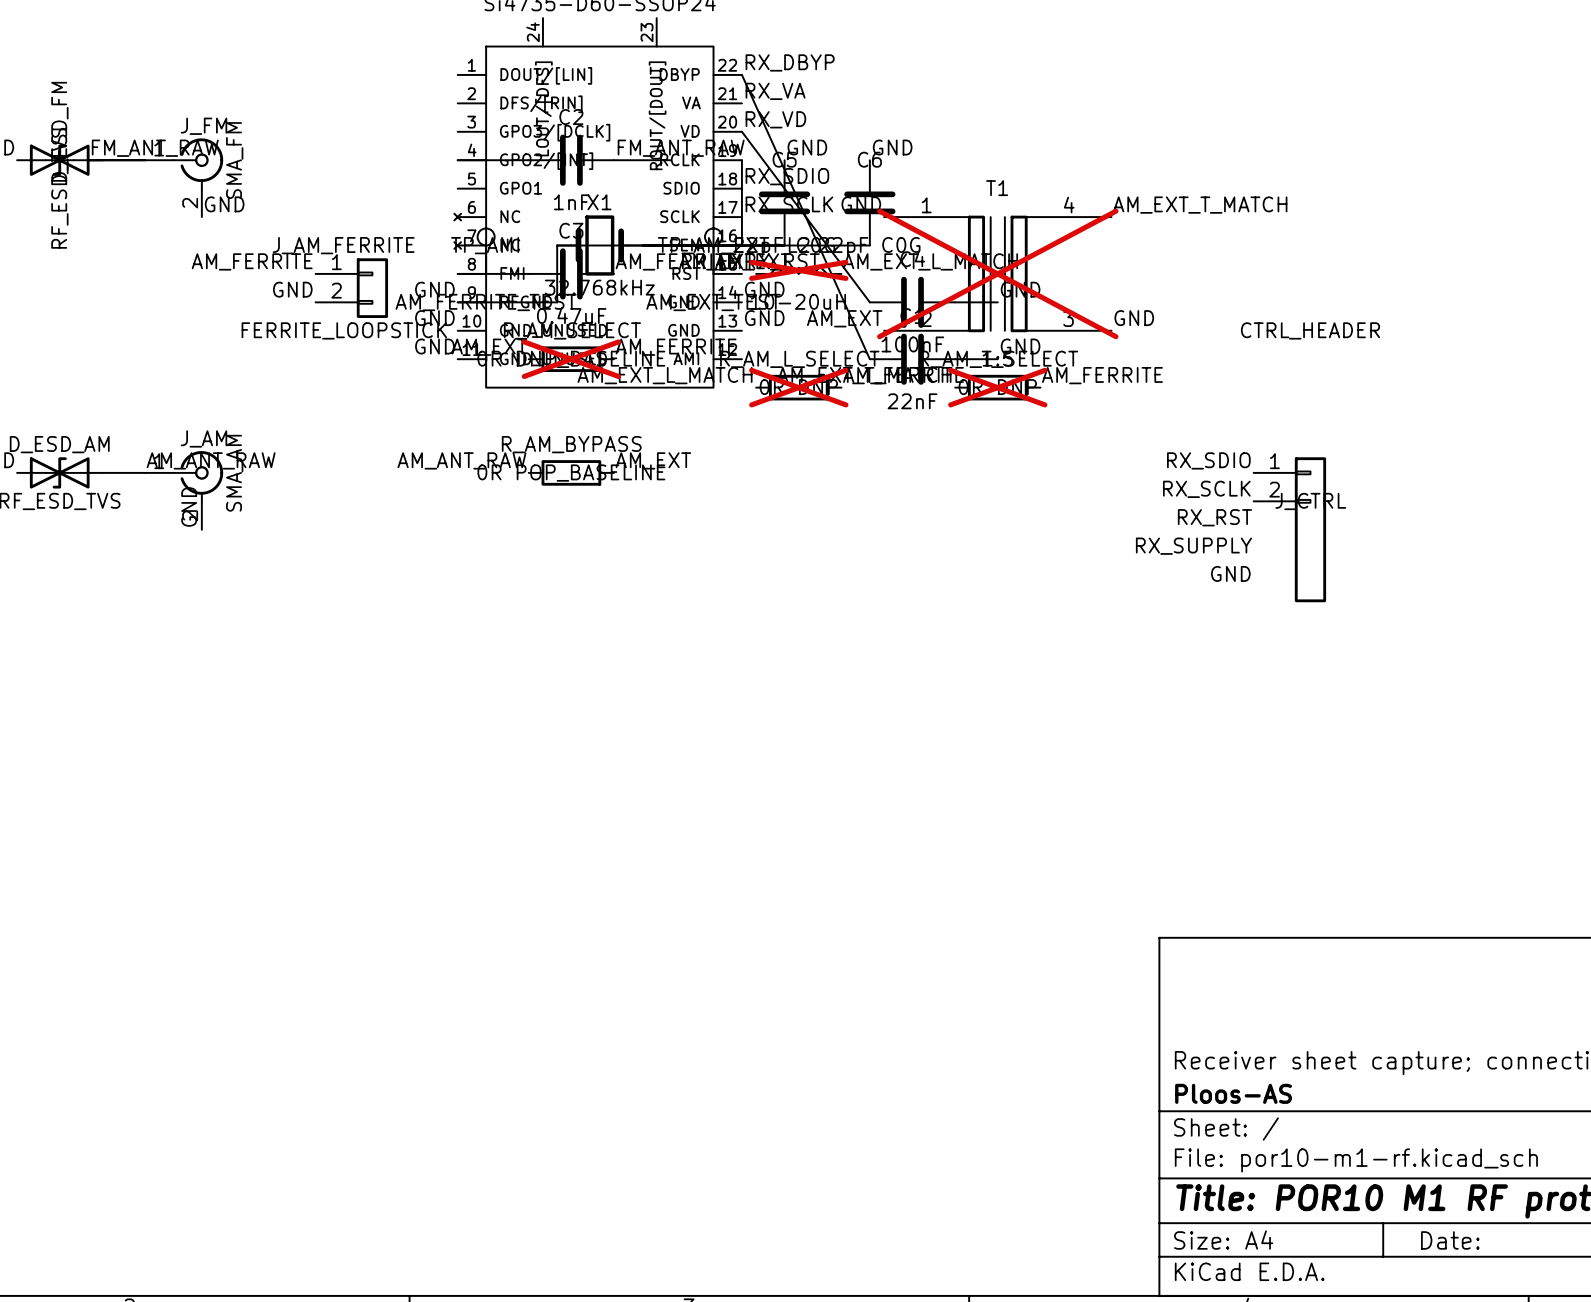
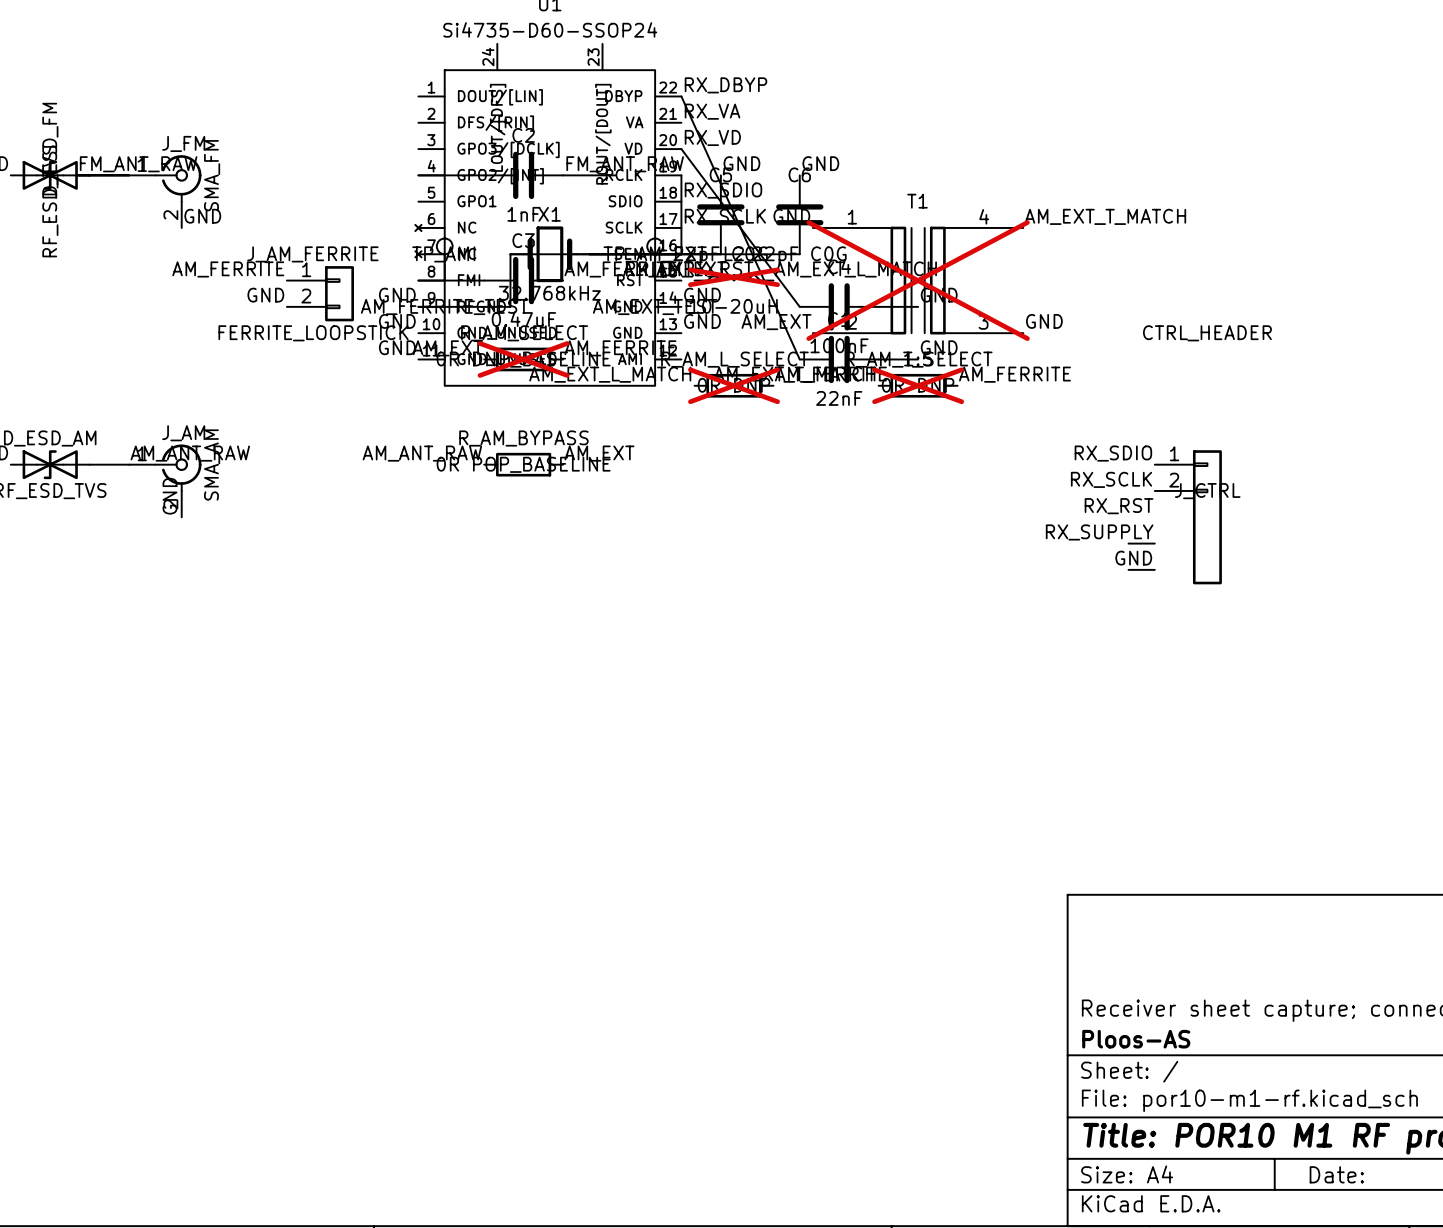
wire: none -> (1128, 543) (1154, 543)
wire: none -> (1128, 569) (1154, 569)

